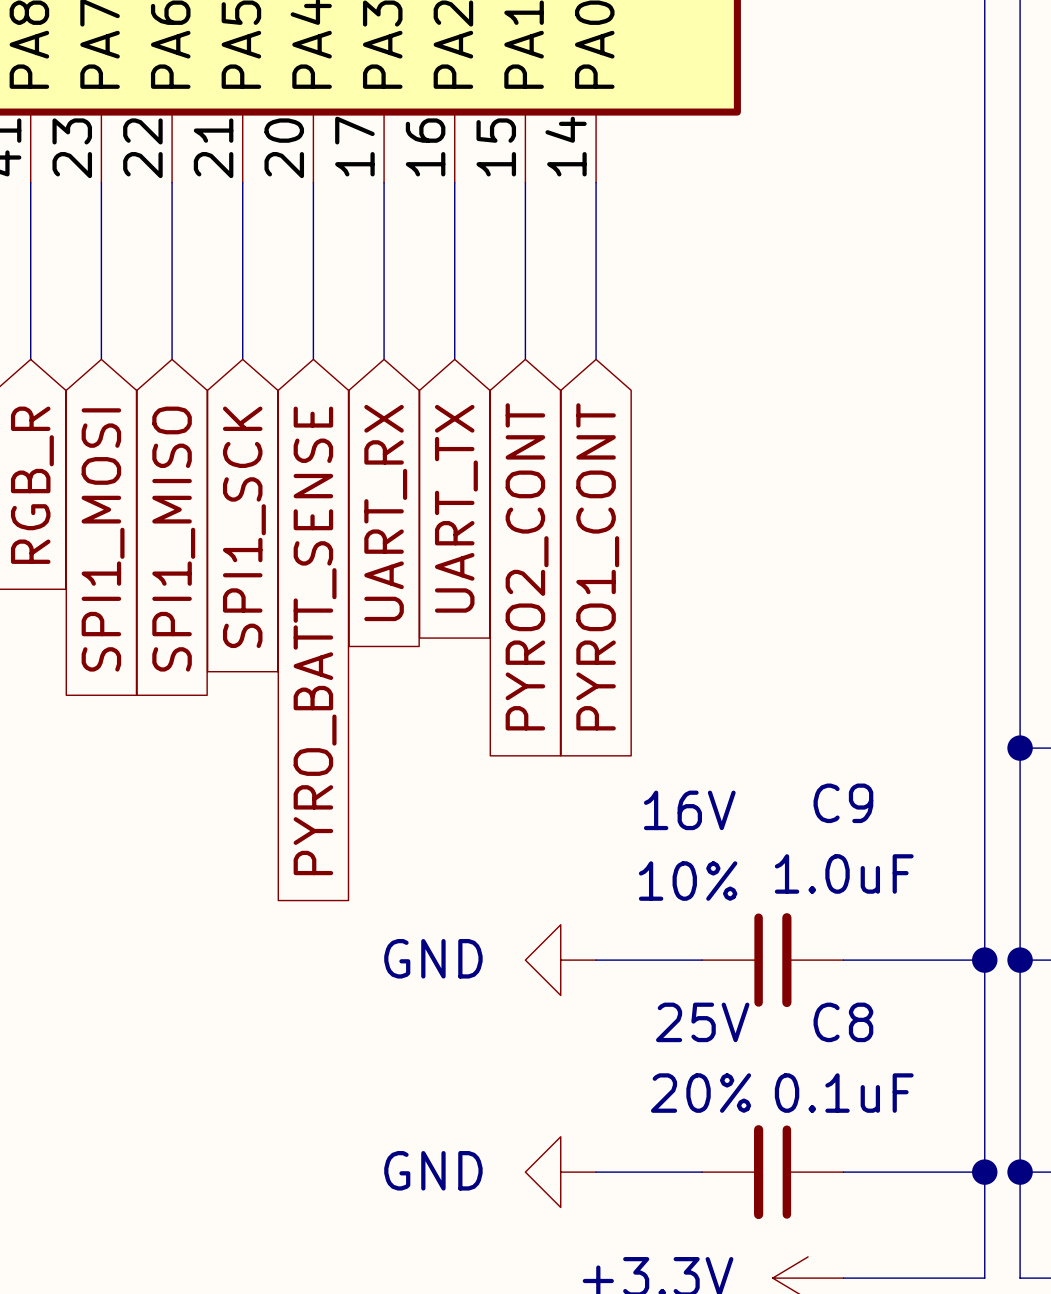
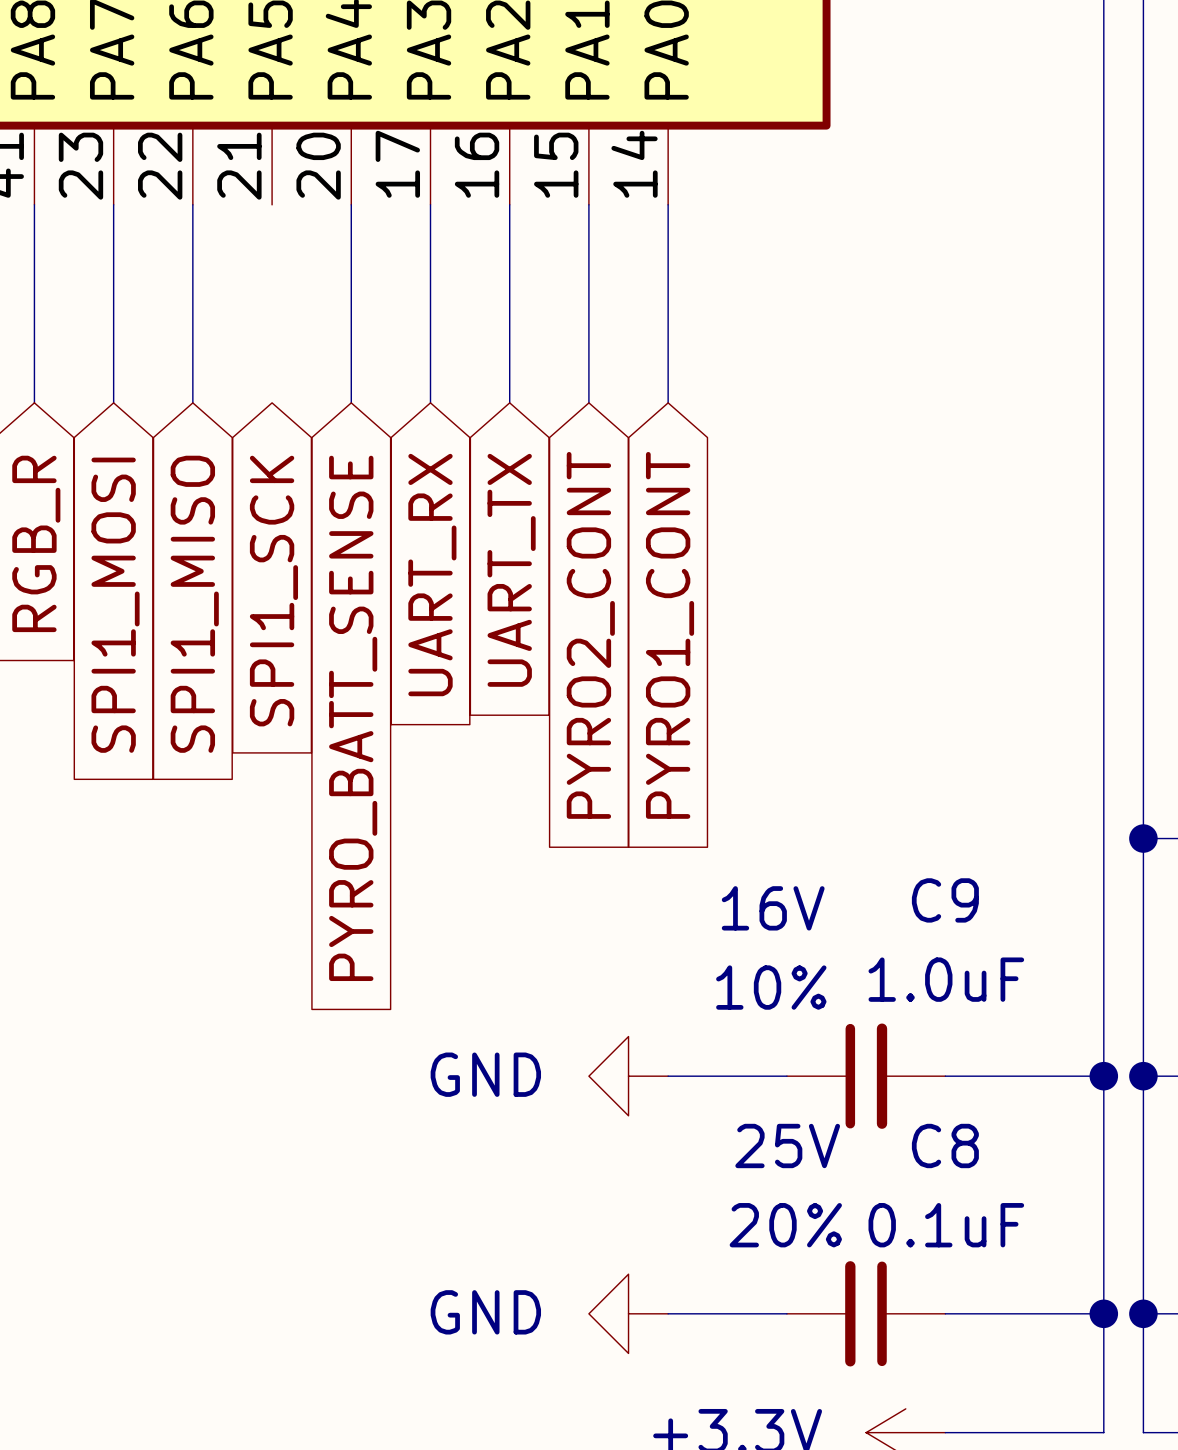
wire: (242, 182) (242, 359) -> none

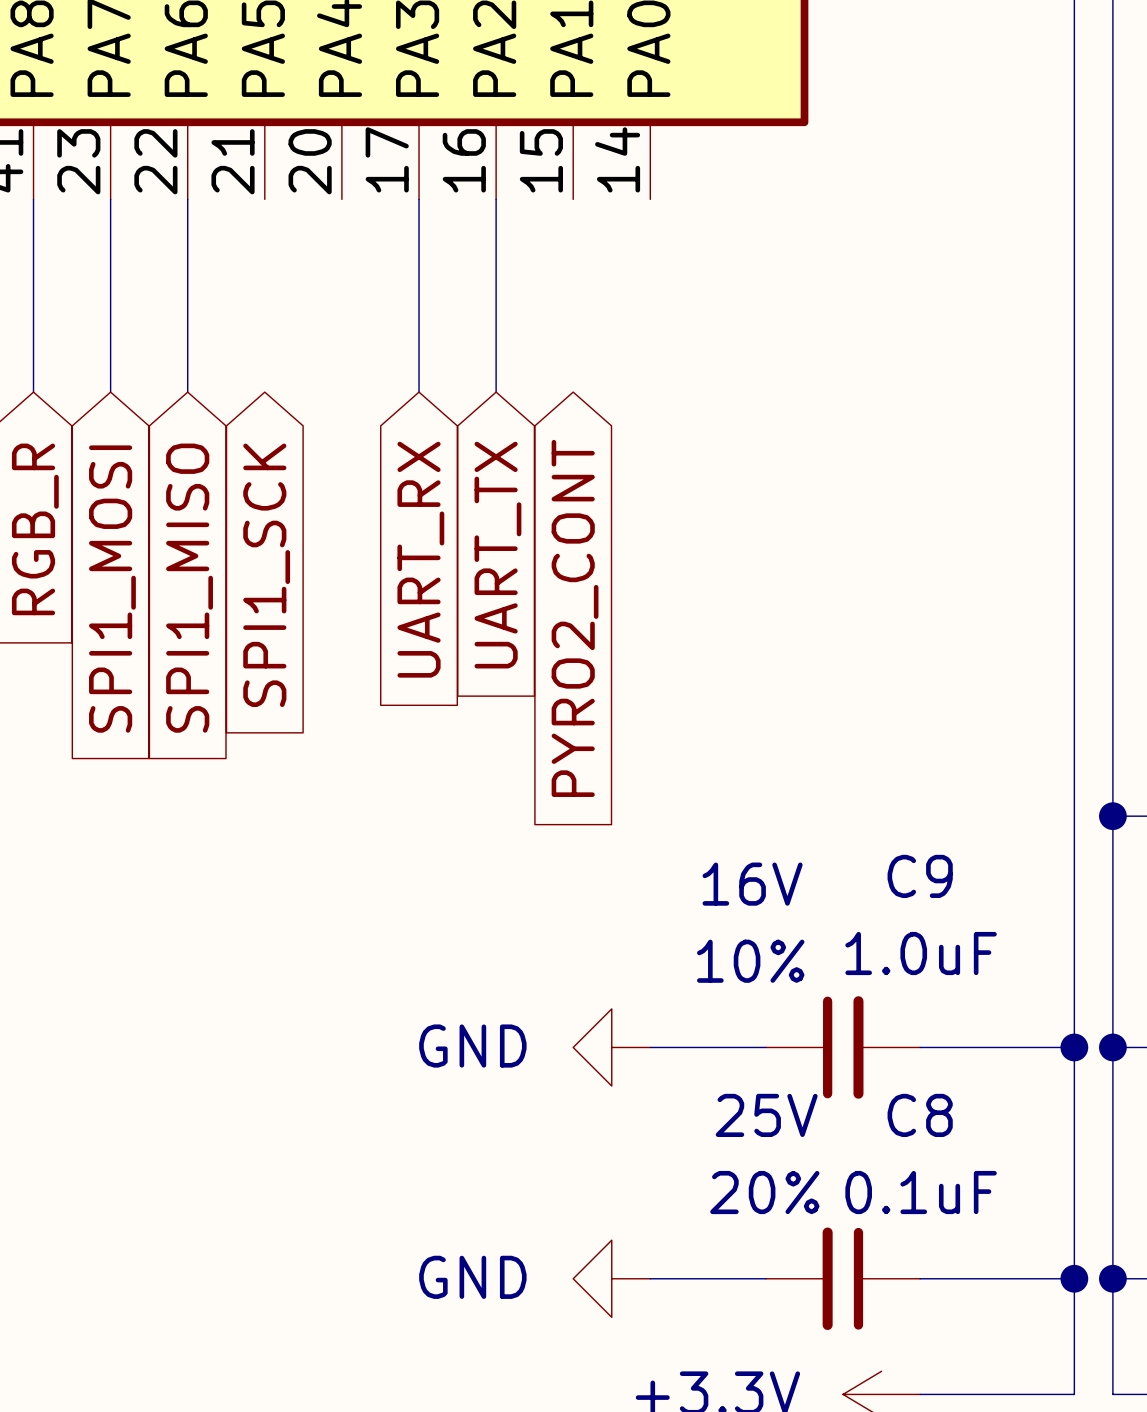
wire: (351, 204) (351, 402) -> none
wire: (588, 204) (588, 402) -> none
wire: (668, 204) (668, 402) -> none
global label: PYRO1_CONT (670, 635) -> none
global label: PYRO_BATT_SENSE (353, 718) -> none

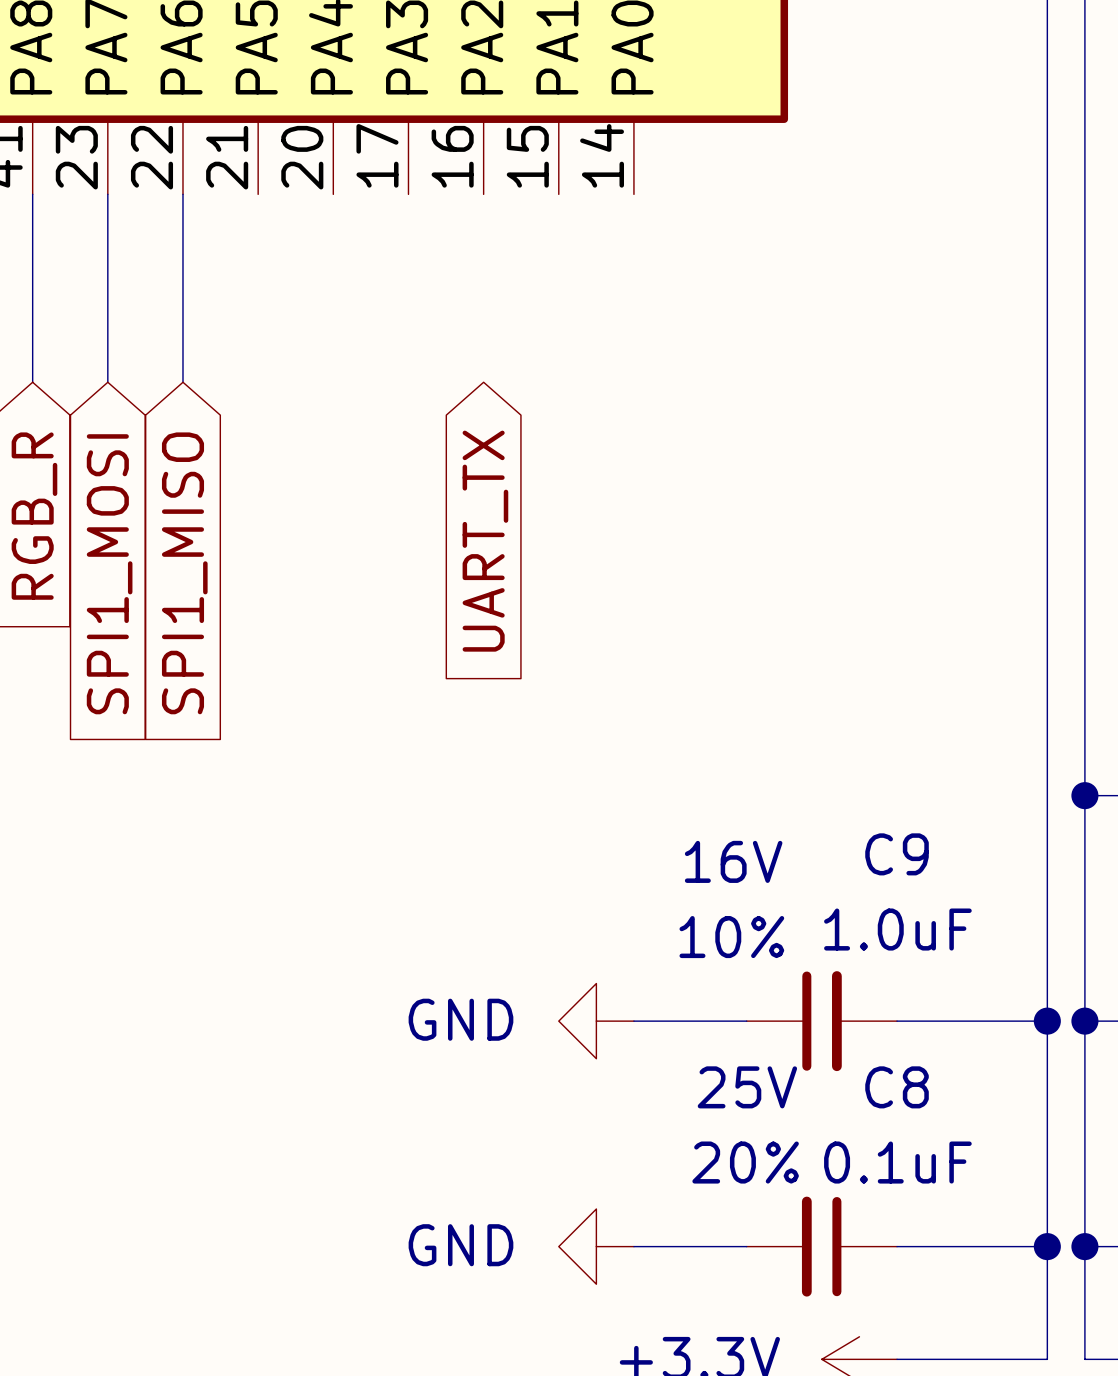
wire: (419, 199) (419, 392) -> none
wire: (496, 199) (496, 392) -> none
global label: UART_RX (420, 559) -> none
global label: SPI1_SCK (266, 575) -> none
global label: PYRO2_CONT (575, 618) -> none

